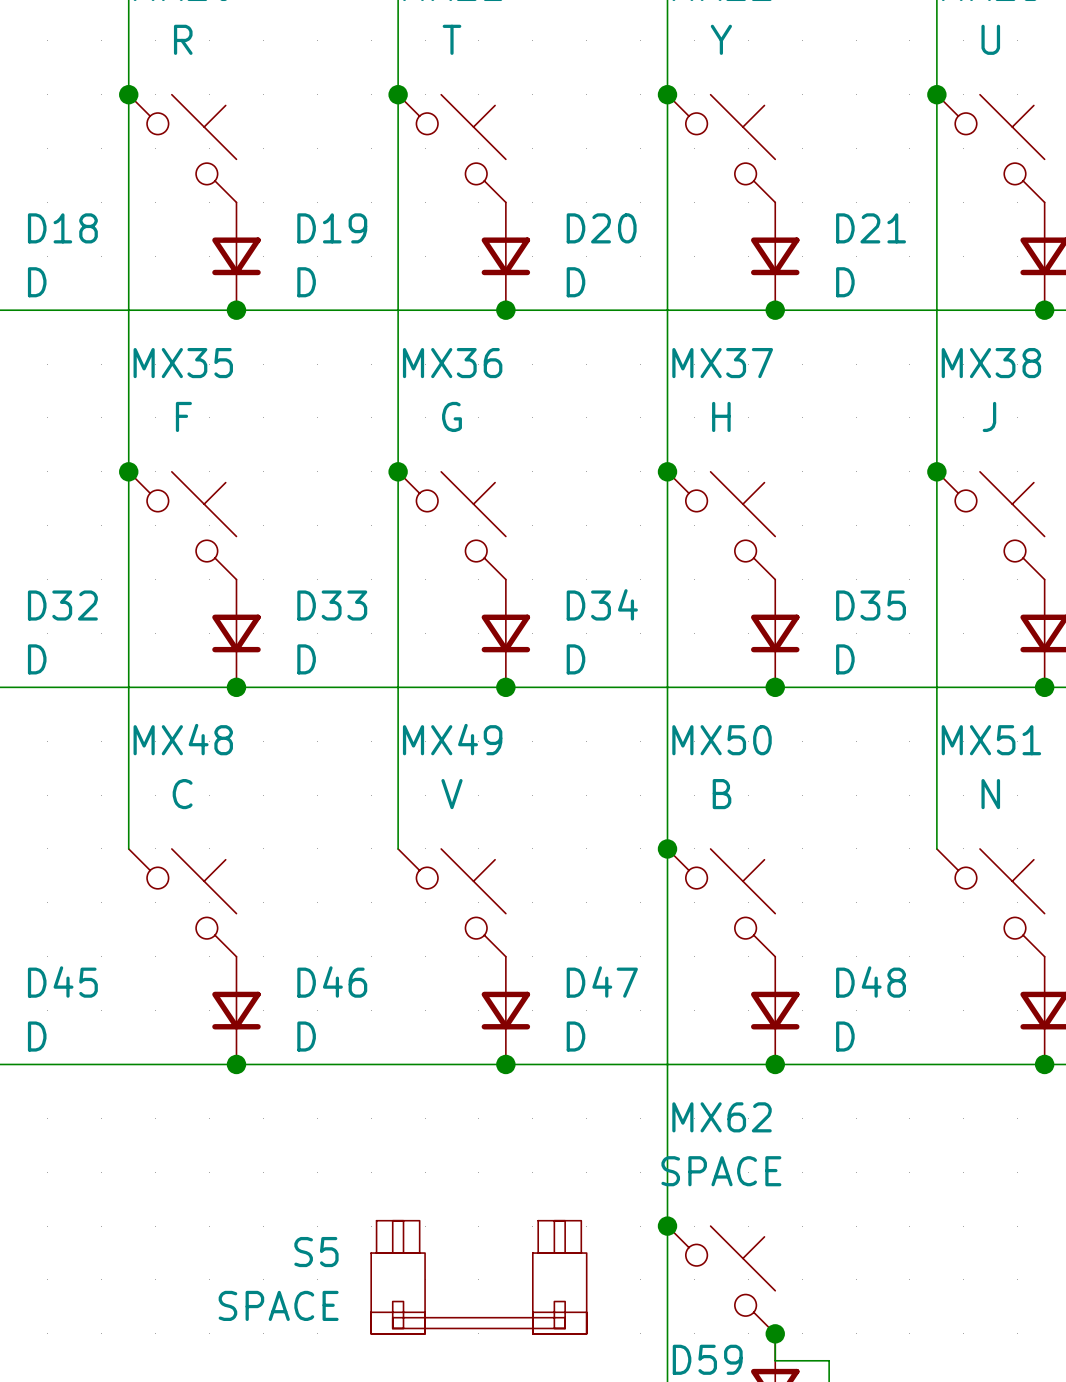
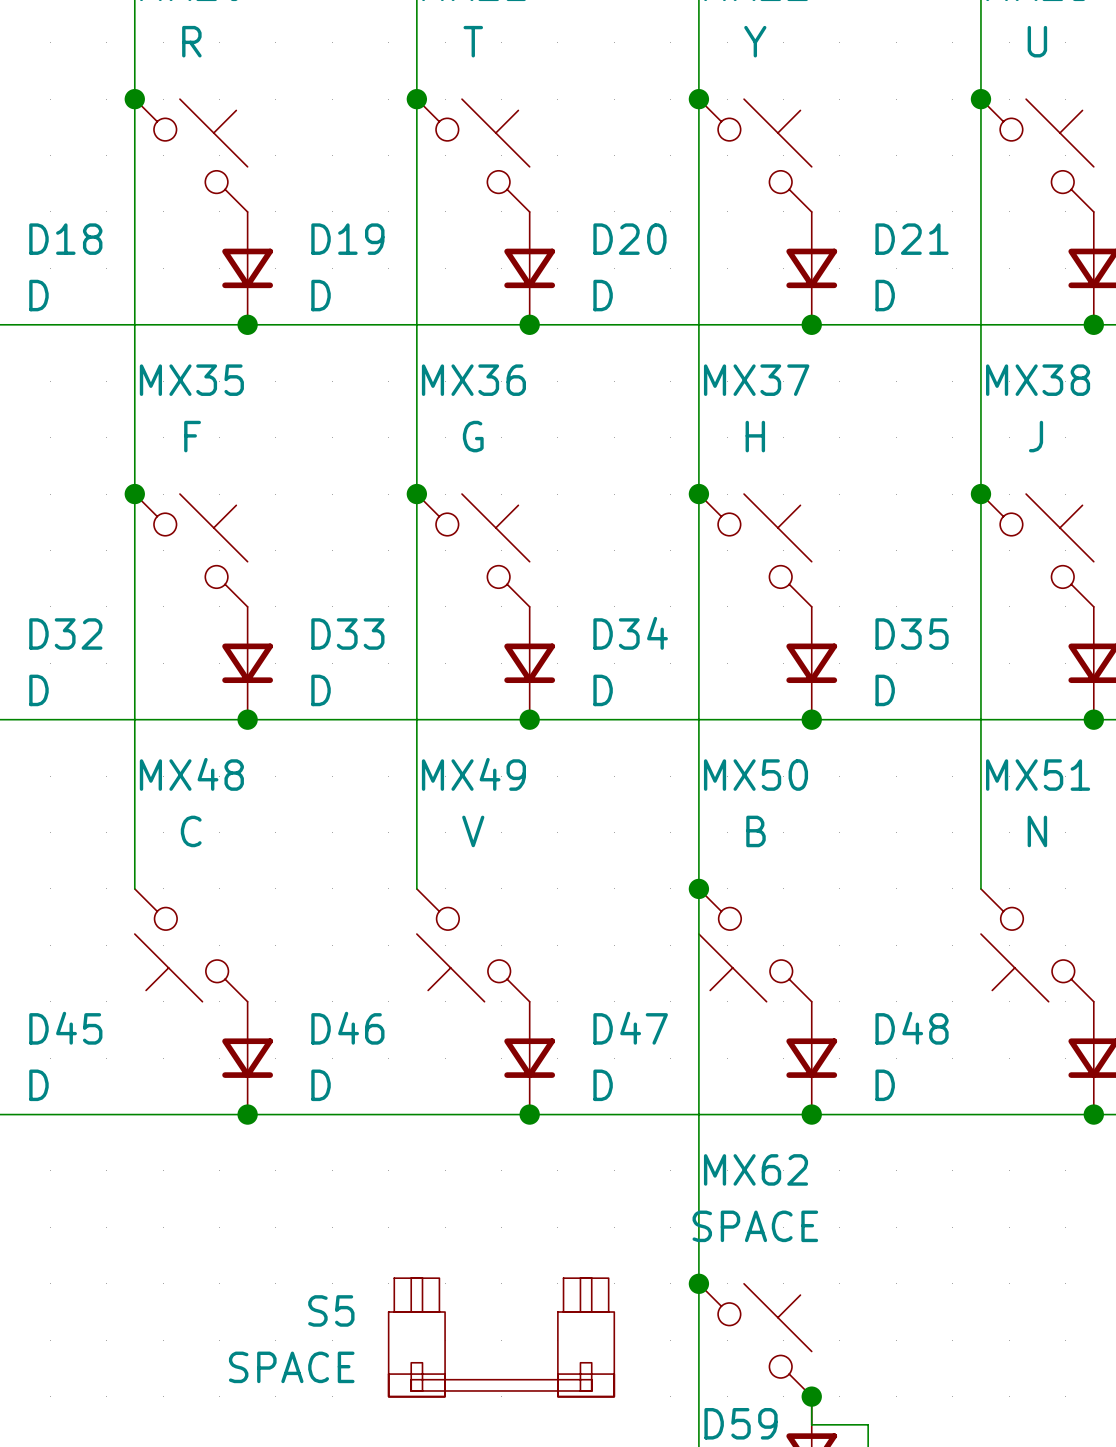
MX48 rotation: 0° (182, 902) -> 180° (191, 945)
MX49 rotation: 0° (451, 902) -> 180° (473, 945)
MX50 rotation: 0° (721, 902) -> 180° (755, 945)
MX51 rotation: 0° (990, 902) -> 180° (1037, 945)

